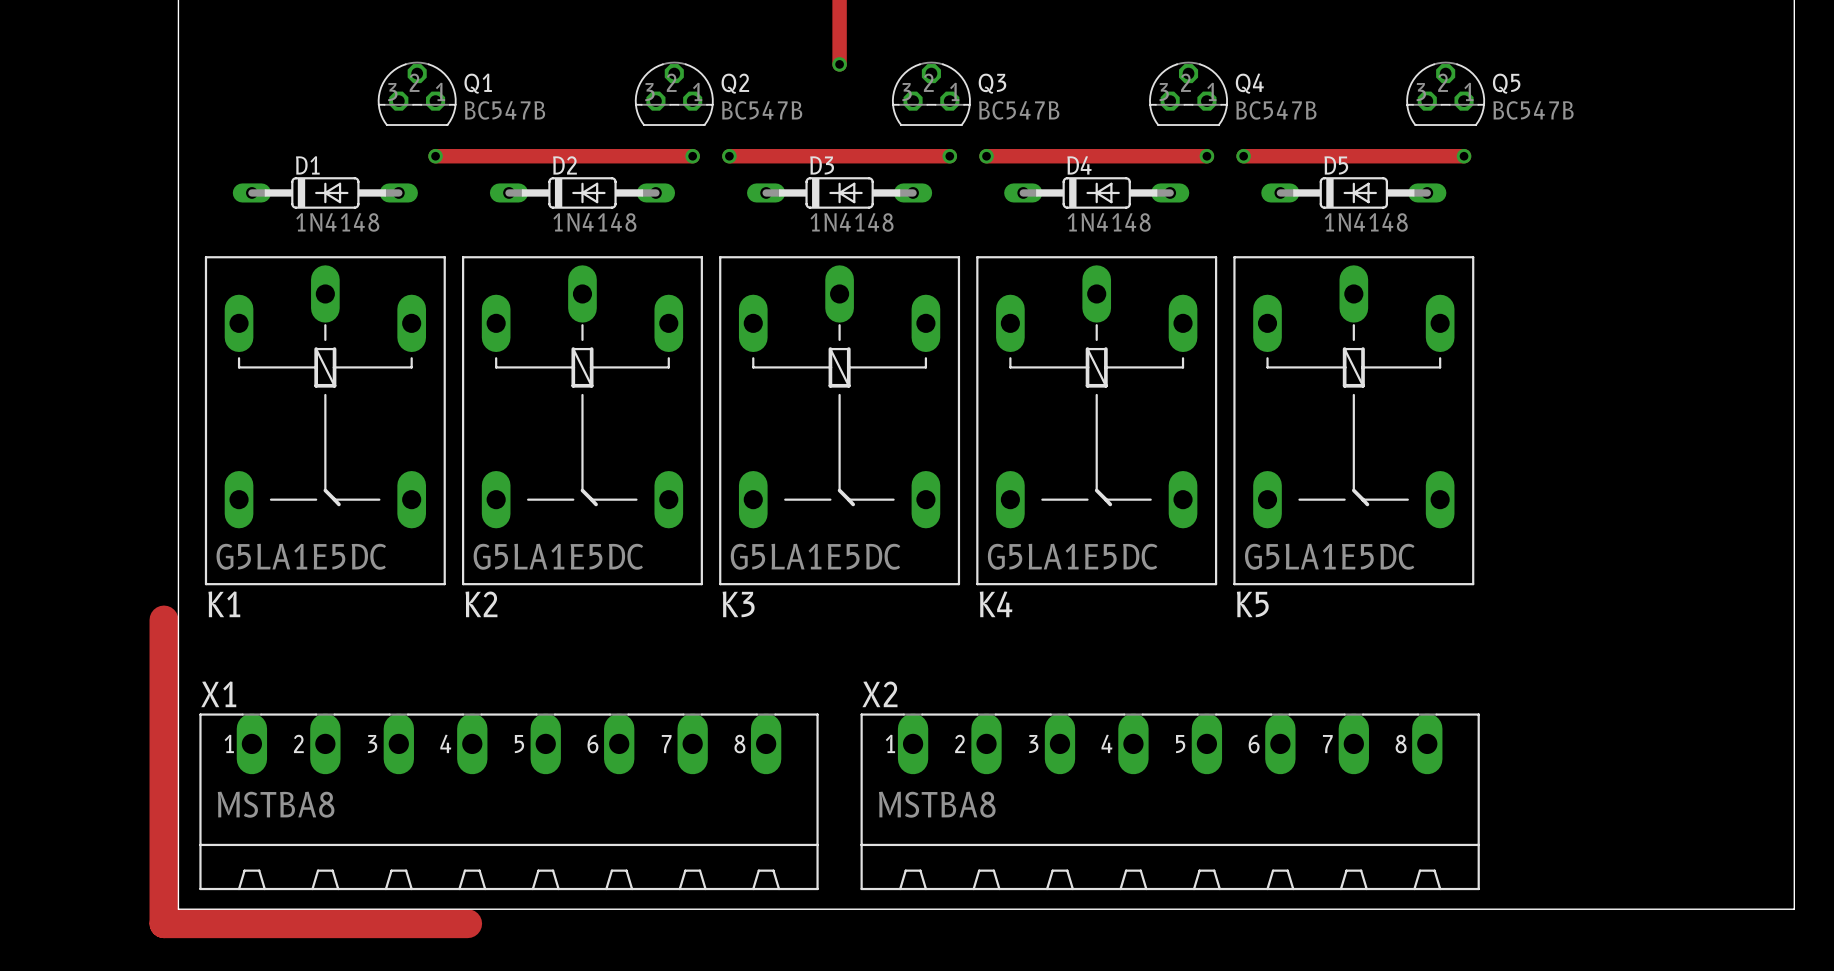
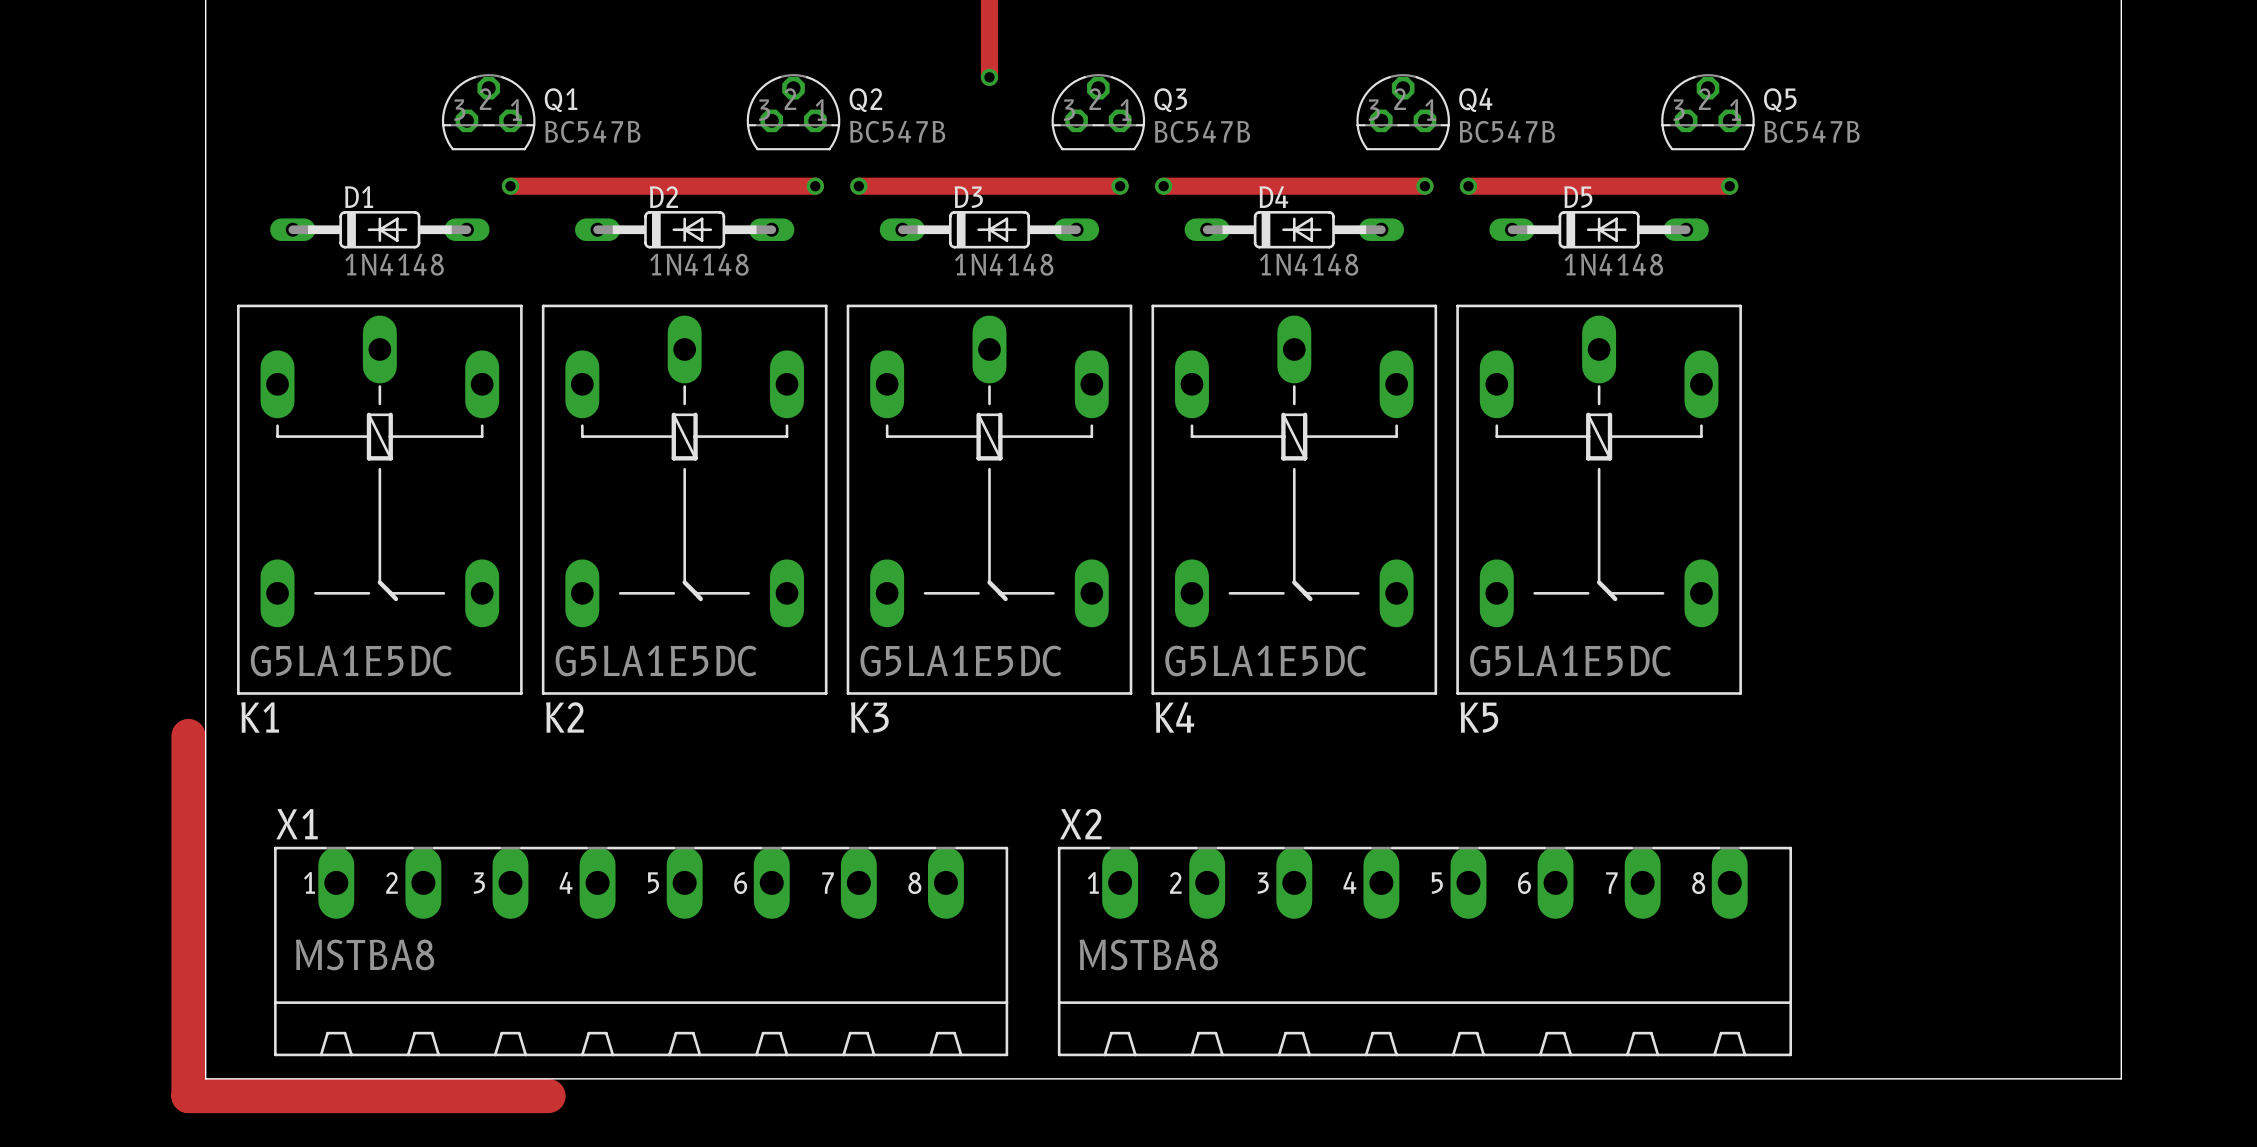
X1 position: (509, 801) -> (641, 951)
X2 position: (1170, 801) -> (1424, 951)

